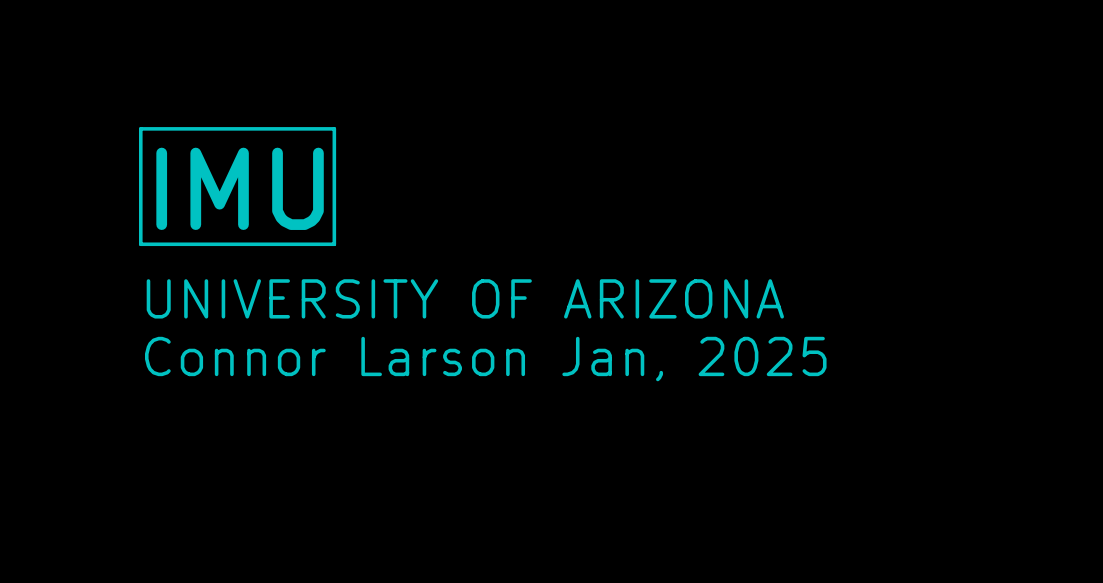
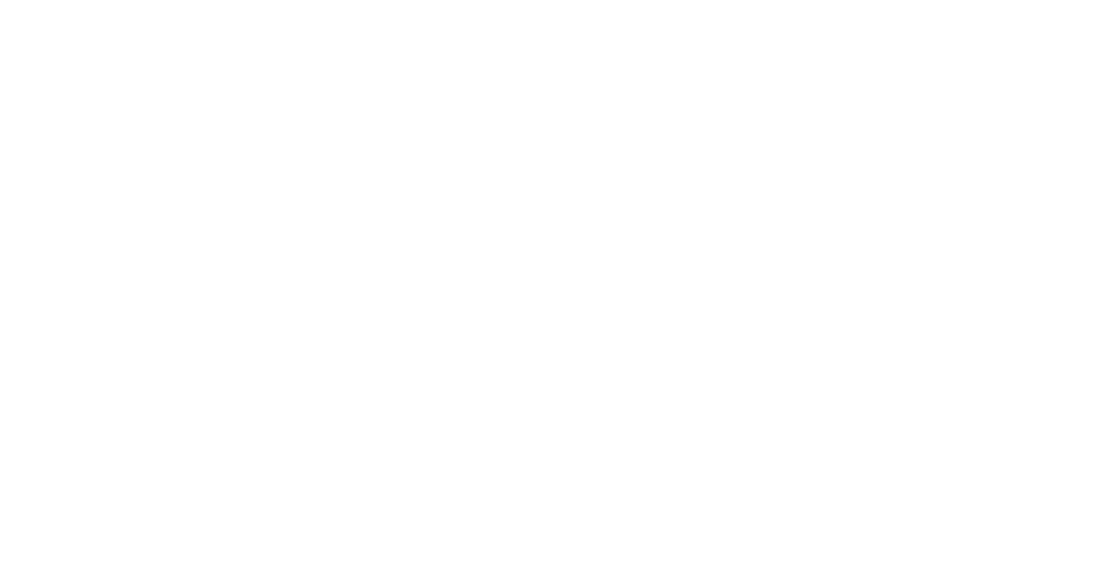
line: (140, 128) (334, 128) (334, 244) (140, 244) (140, 128) -> none
text: IMU (240, 188) -> none
text: UNIVERSITY OF ARIZONA (465, 298) -> none
text: Connor Larson Jan, 2025 (485, 359) -> none

